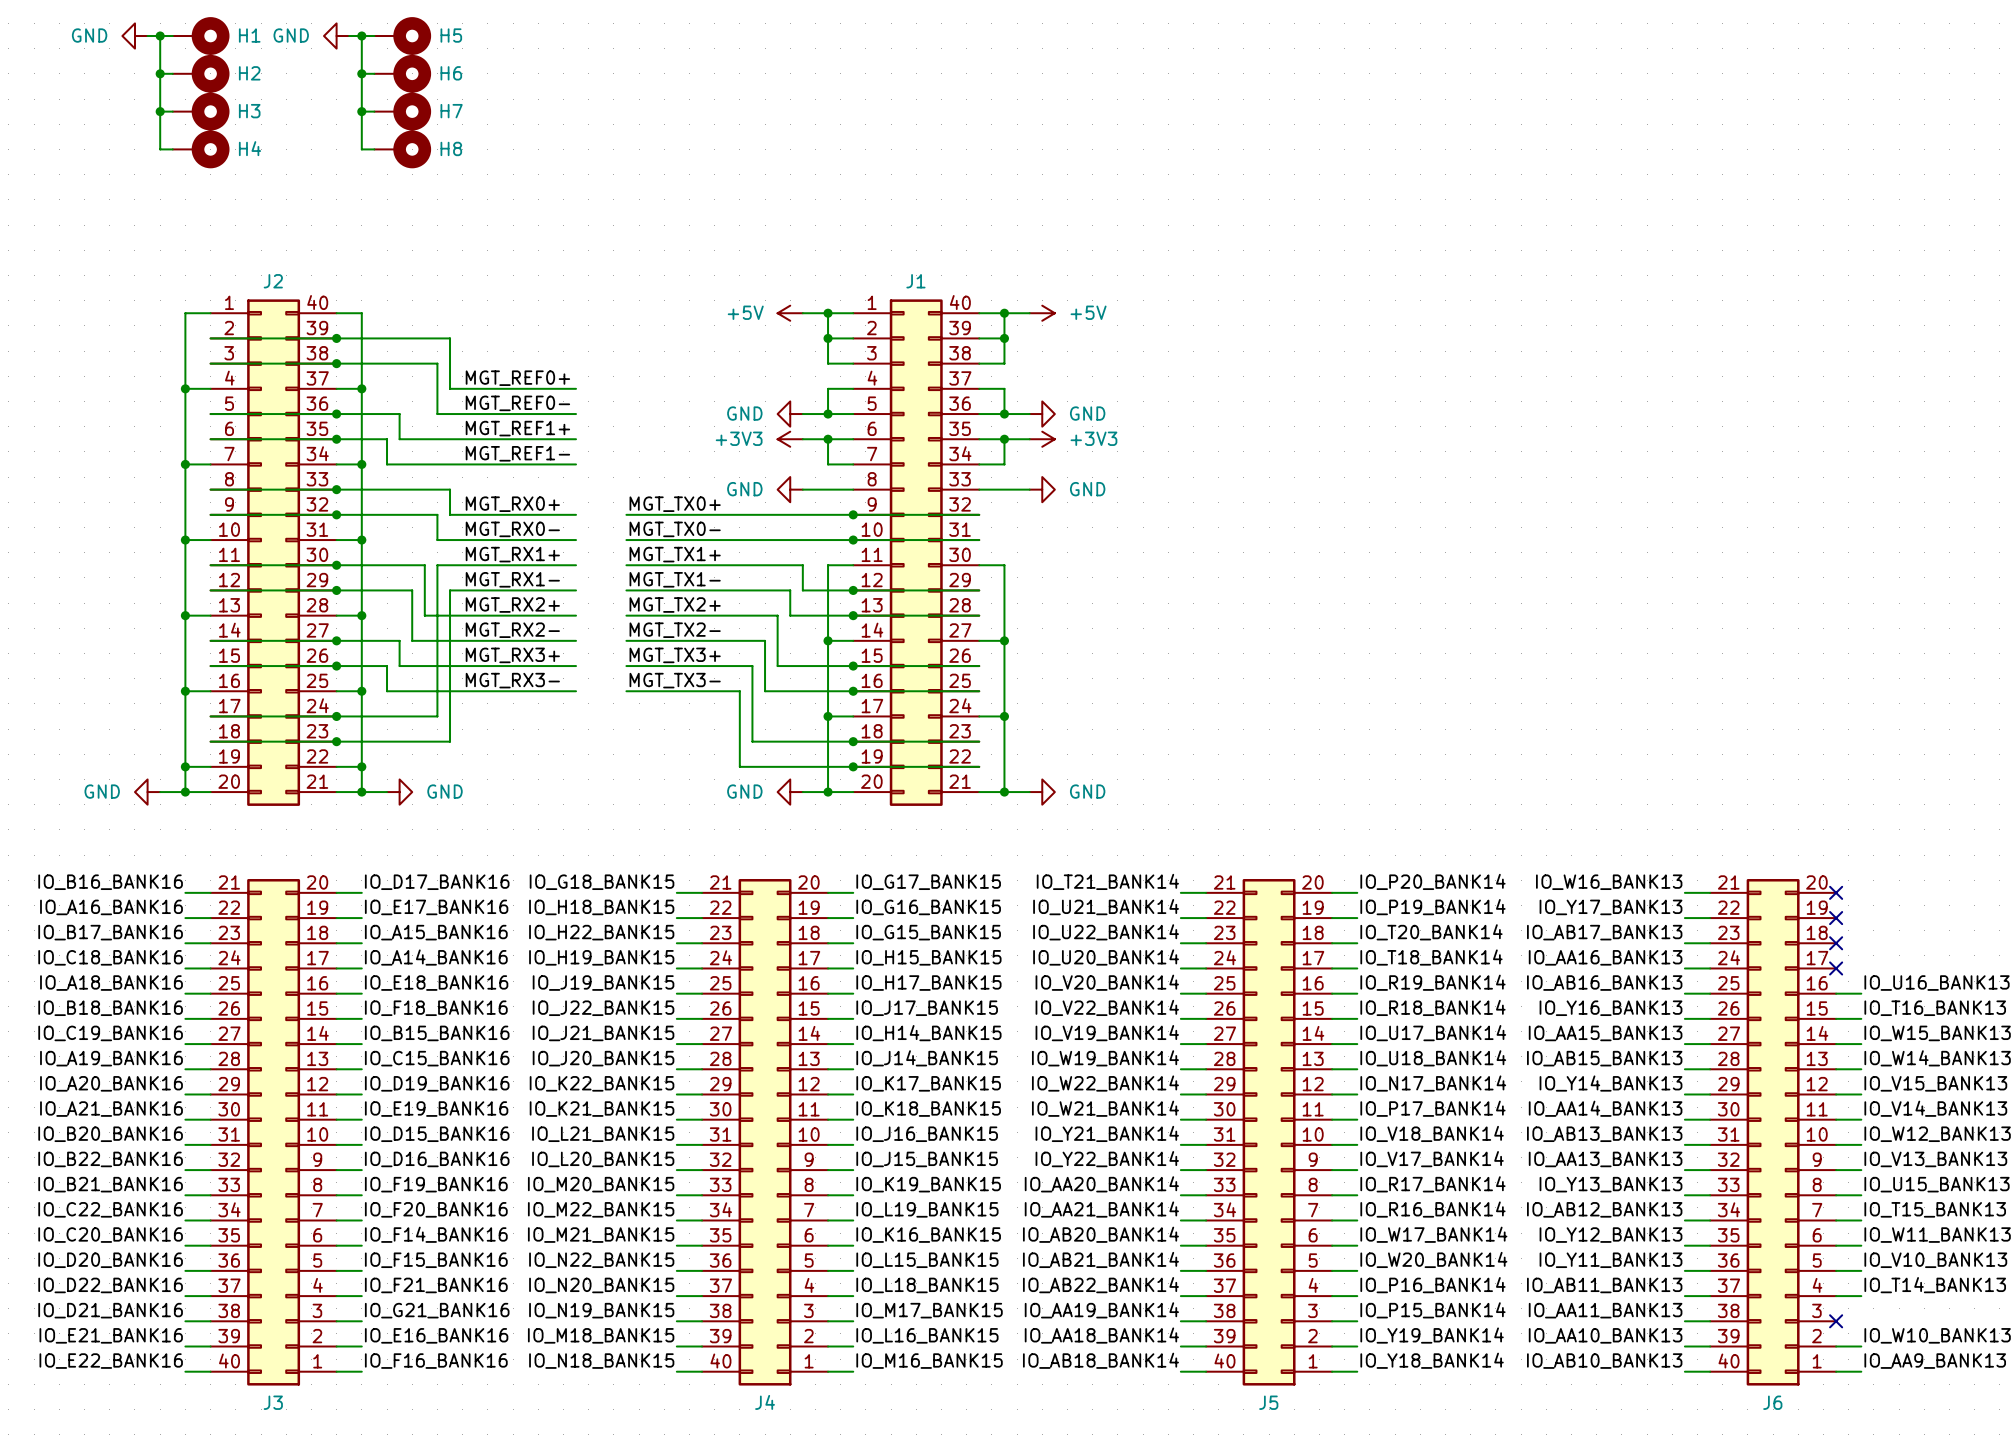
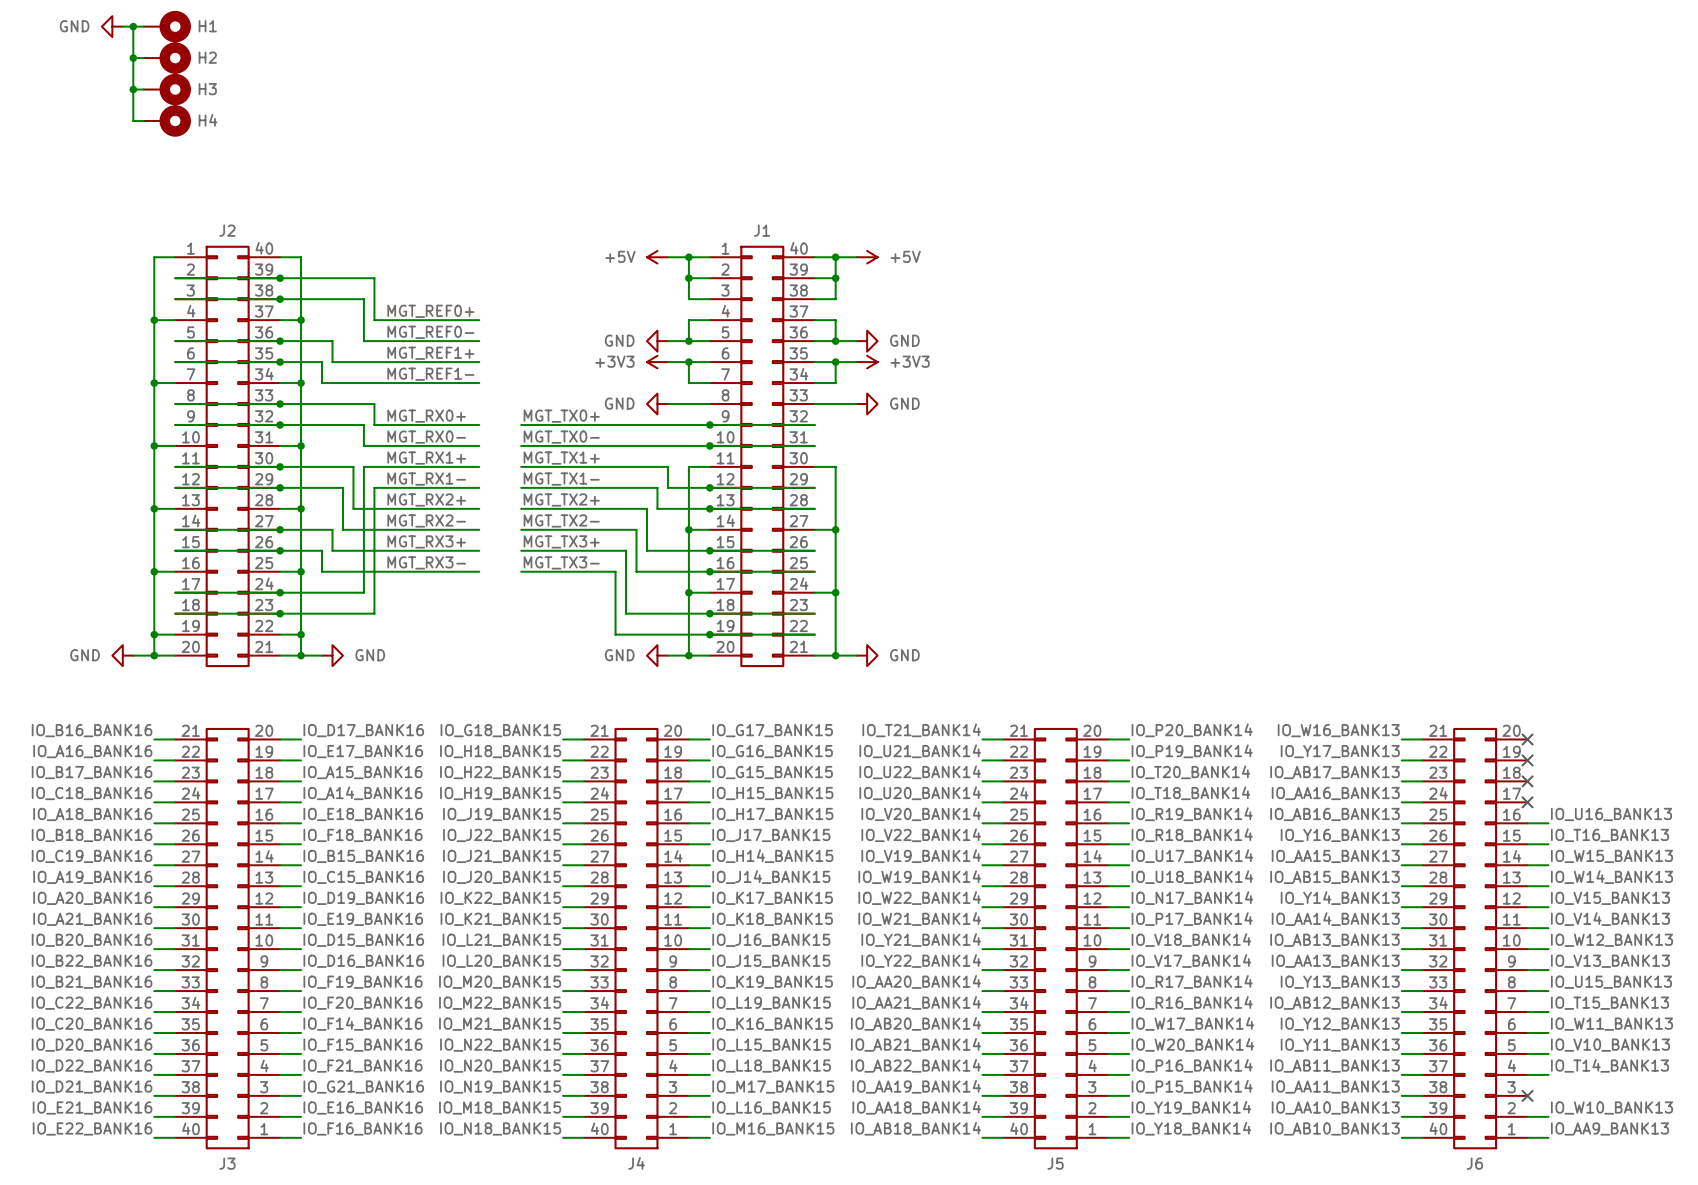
power symbol: GND (336, 36) -> none
wire: (349, 36) (374, 36) -> none
wire: (361, 36) (361, 149) (374, 149) -> none
junction: (361, 36) -> none
H5: (402, 36) -> none
wire: (361, 73) (374, 73) -> none
junction: (361, 73) -> none
H6: (402, 73) -> none
wire: (361, 111) (374, 111) -> none
junction: (361, 111) -> none
H7: (402, 111) -> none
H8: (402, 149) -> none

